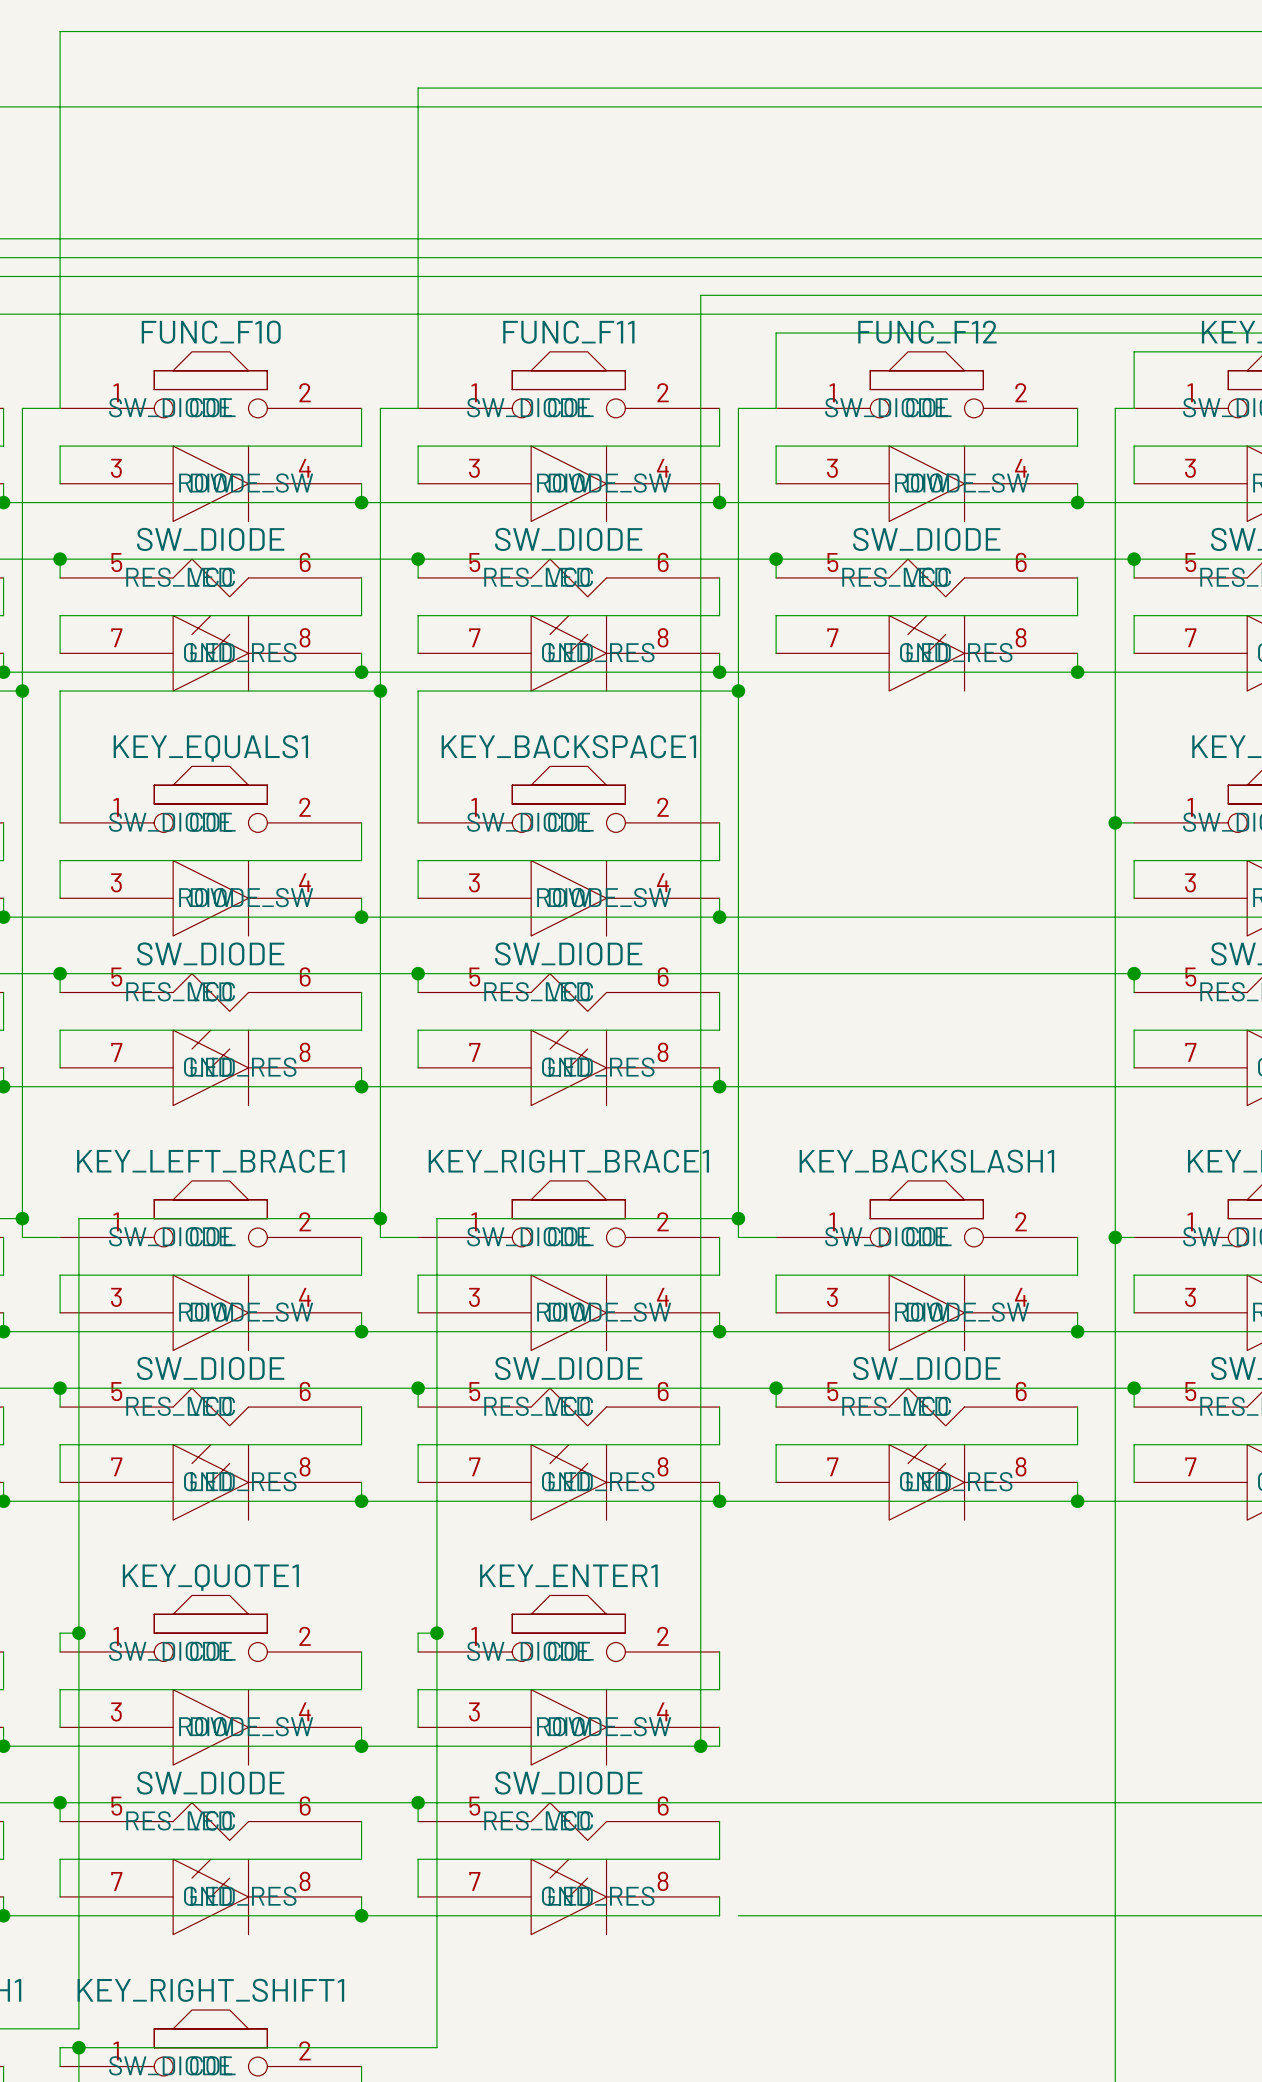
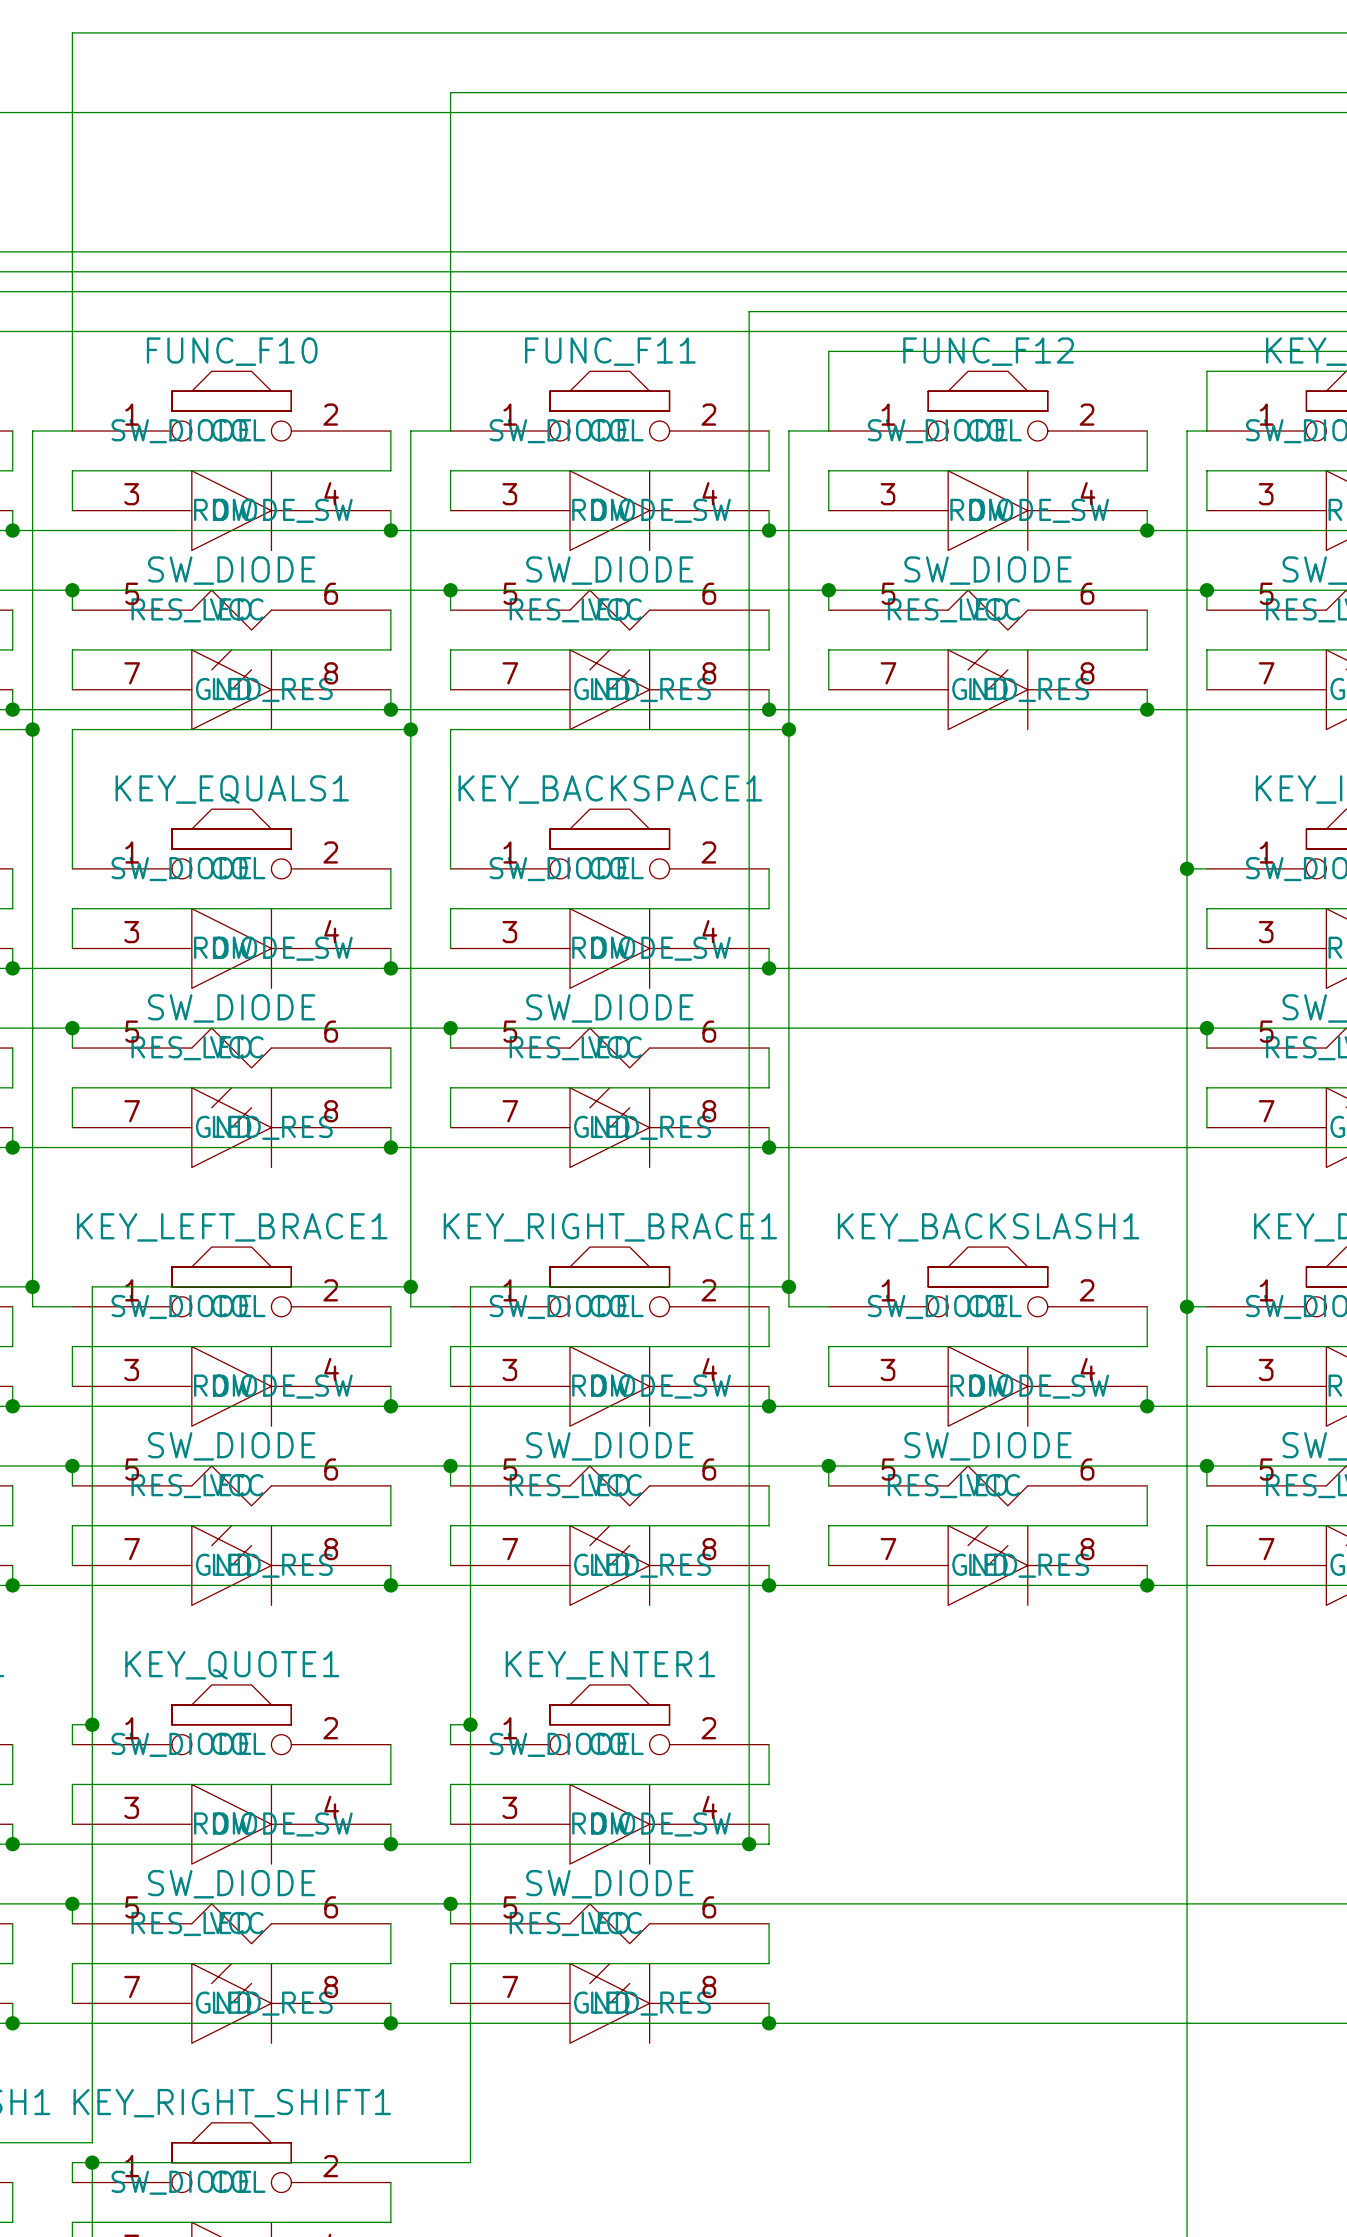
wire: none -> (769, 2023) (788, 2023)
junction: none -> (769, 2023)

